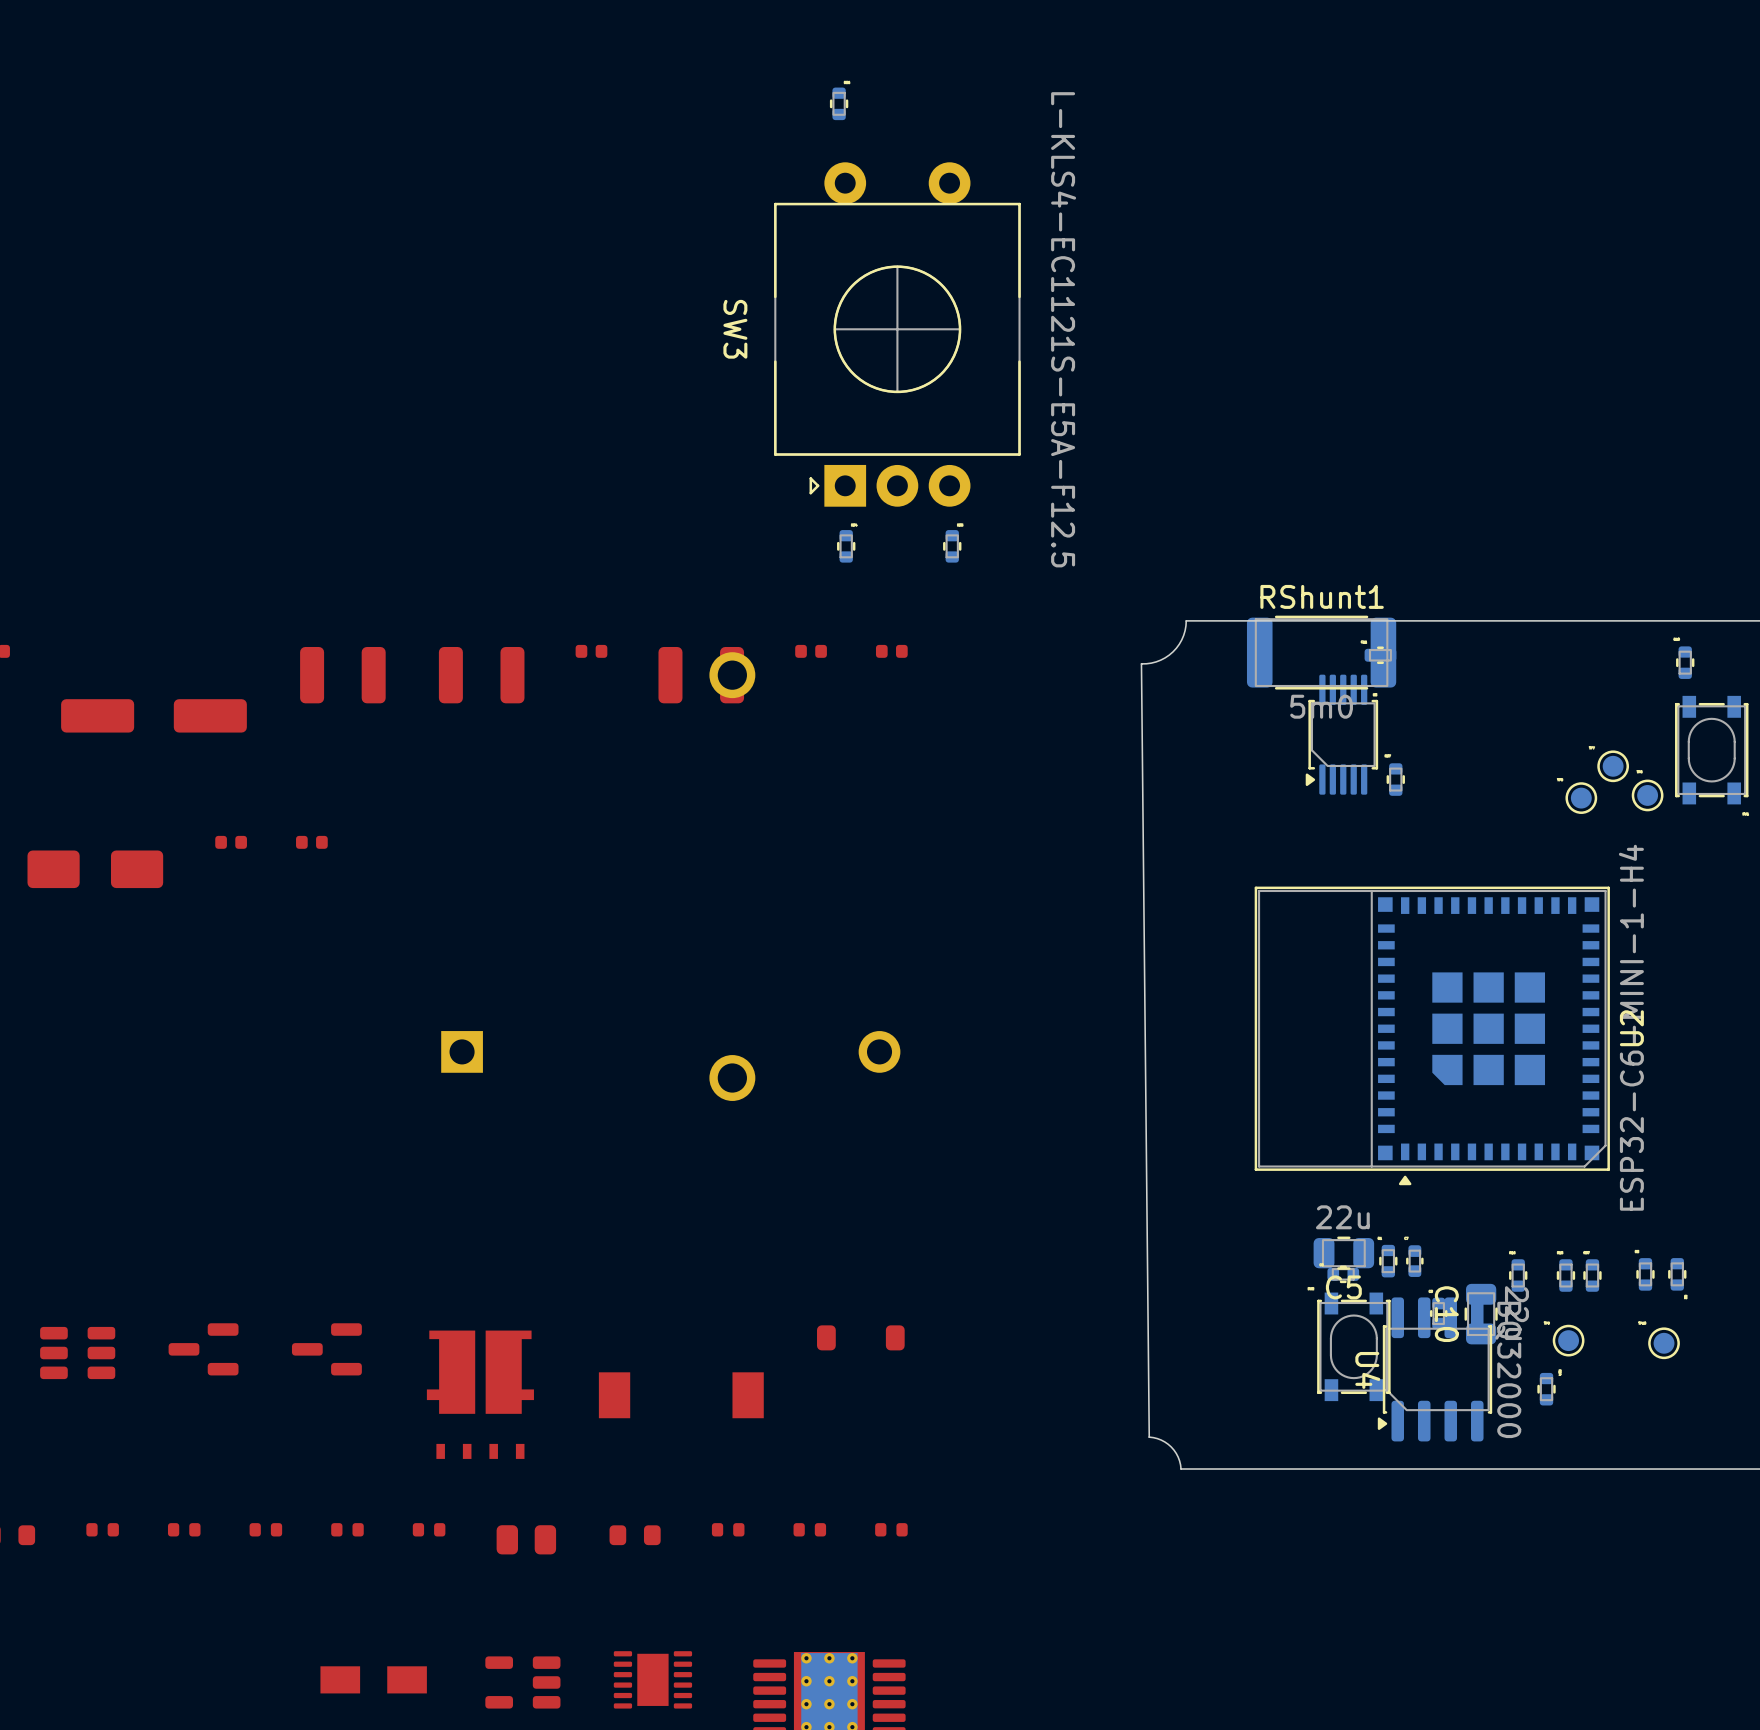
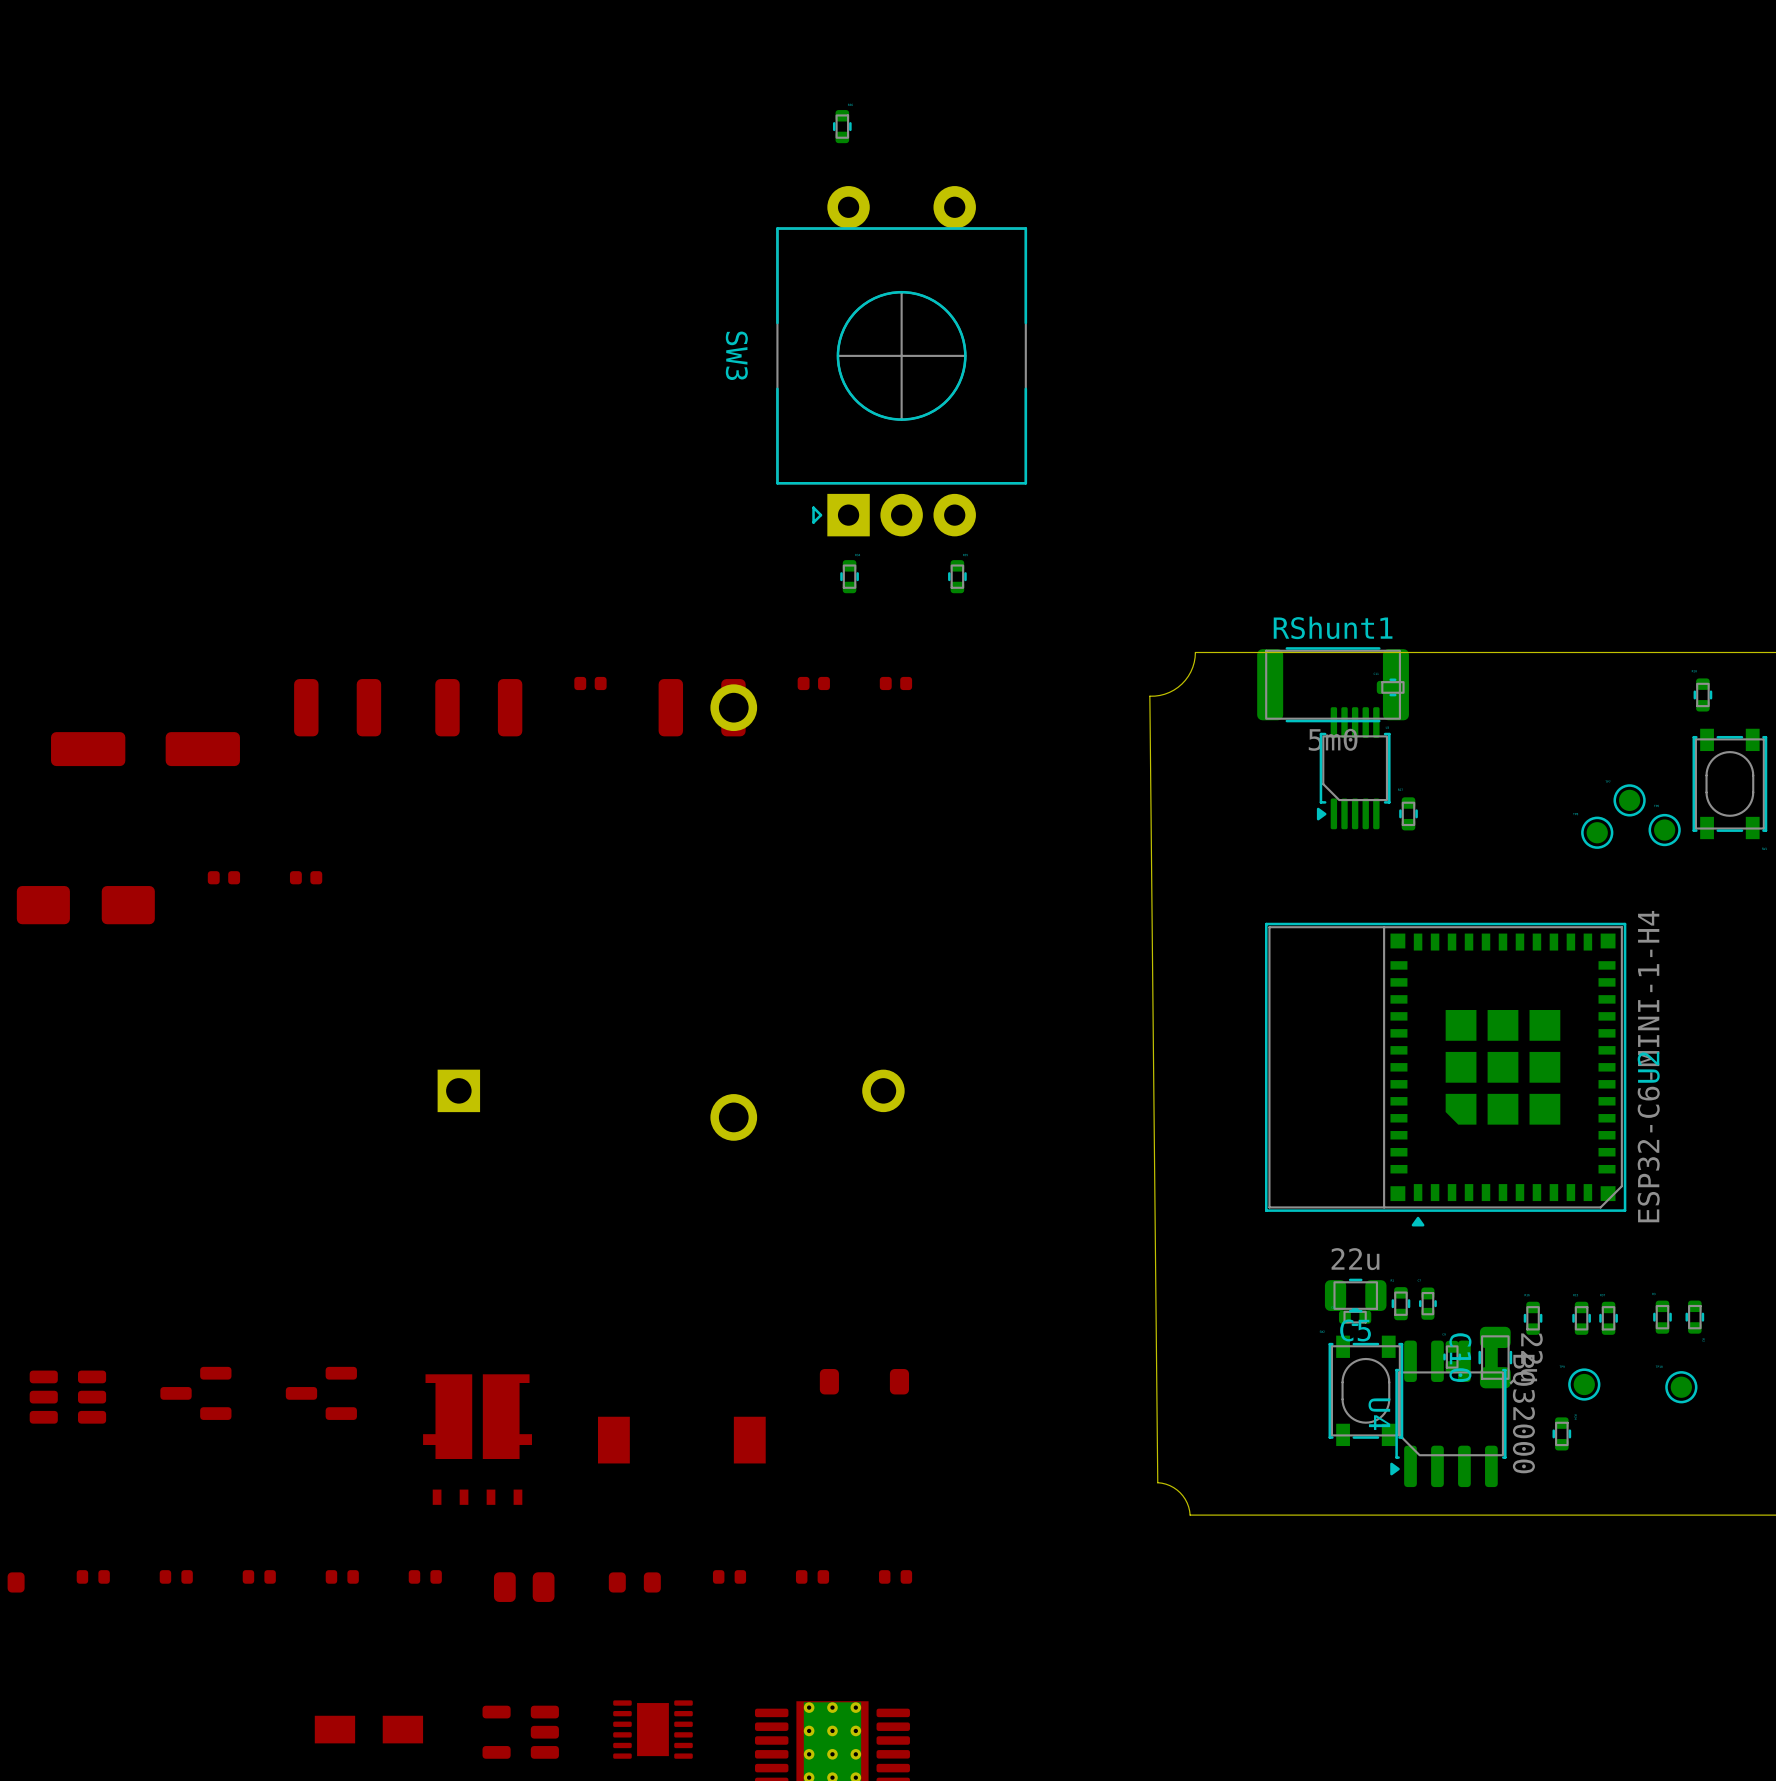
SW3 value: L-KLS4-EC1121S-E5A-F12.5 (1063, 329) -> none

